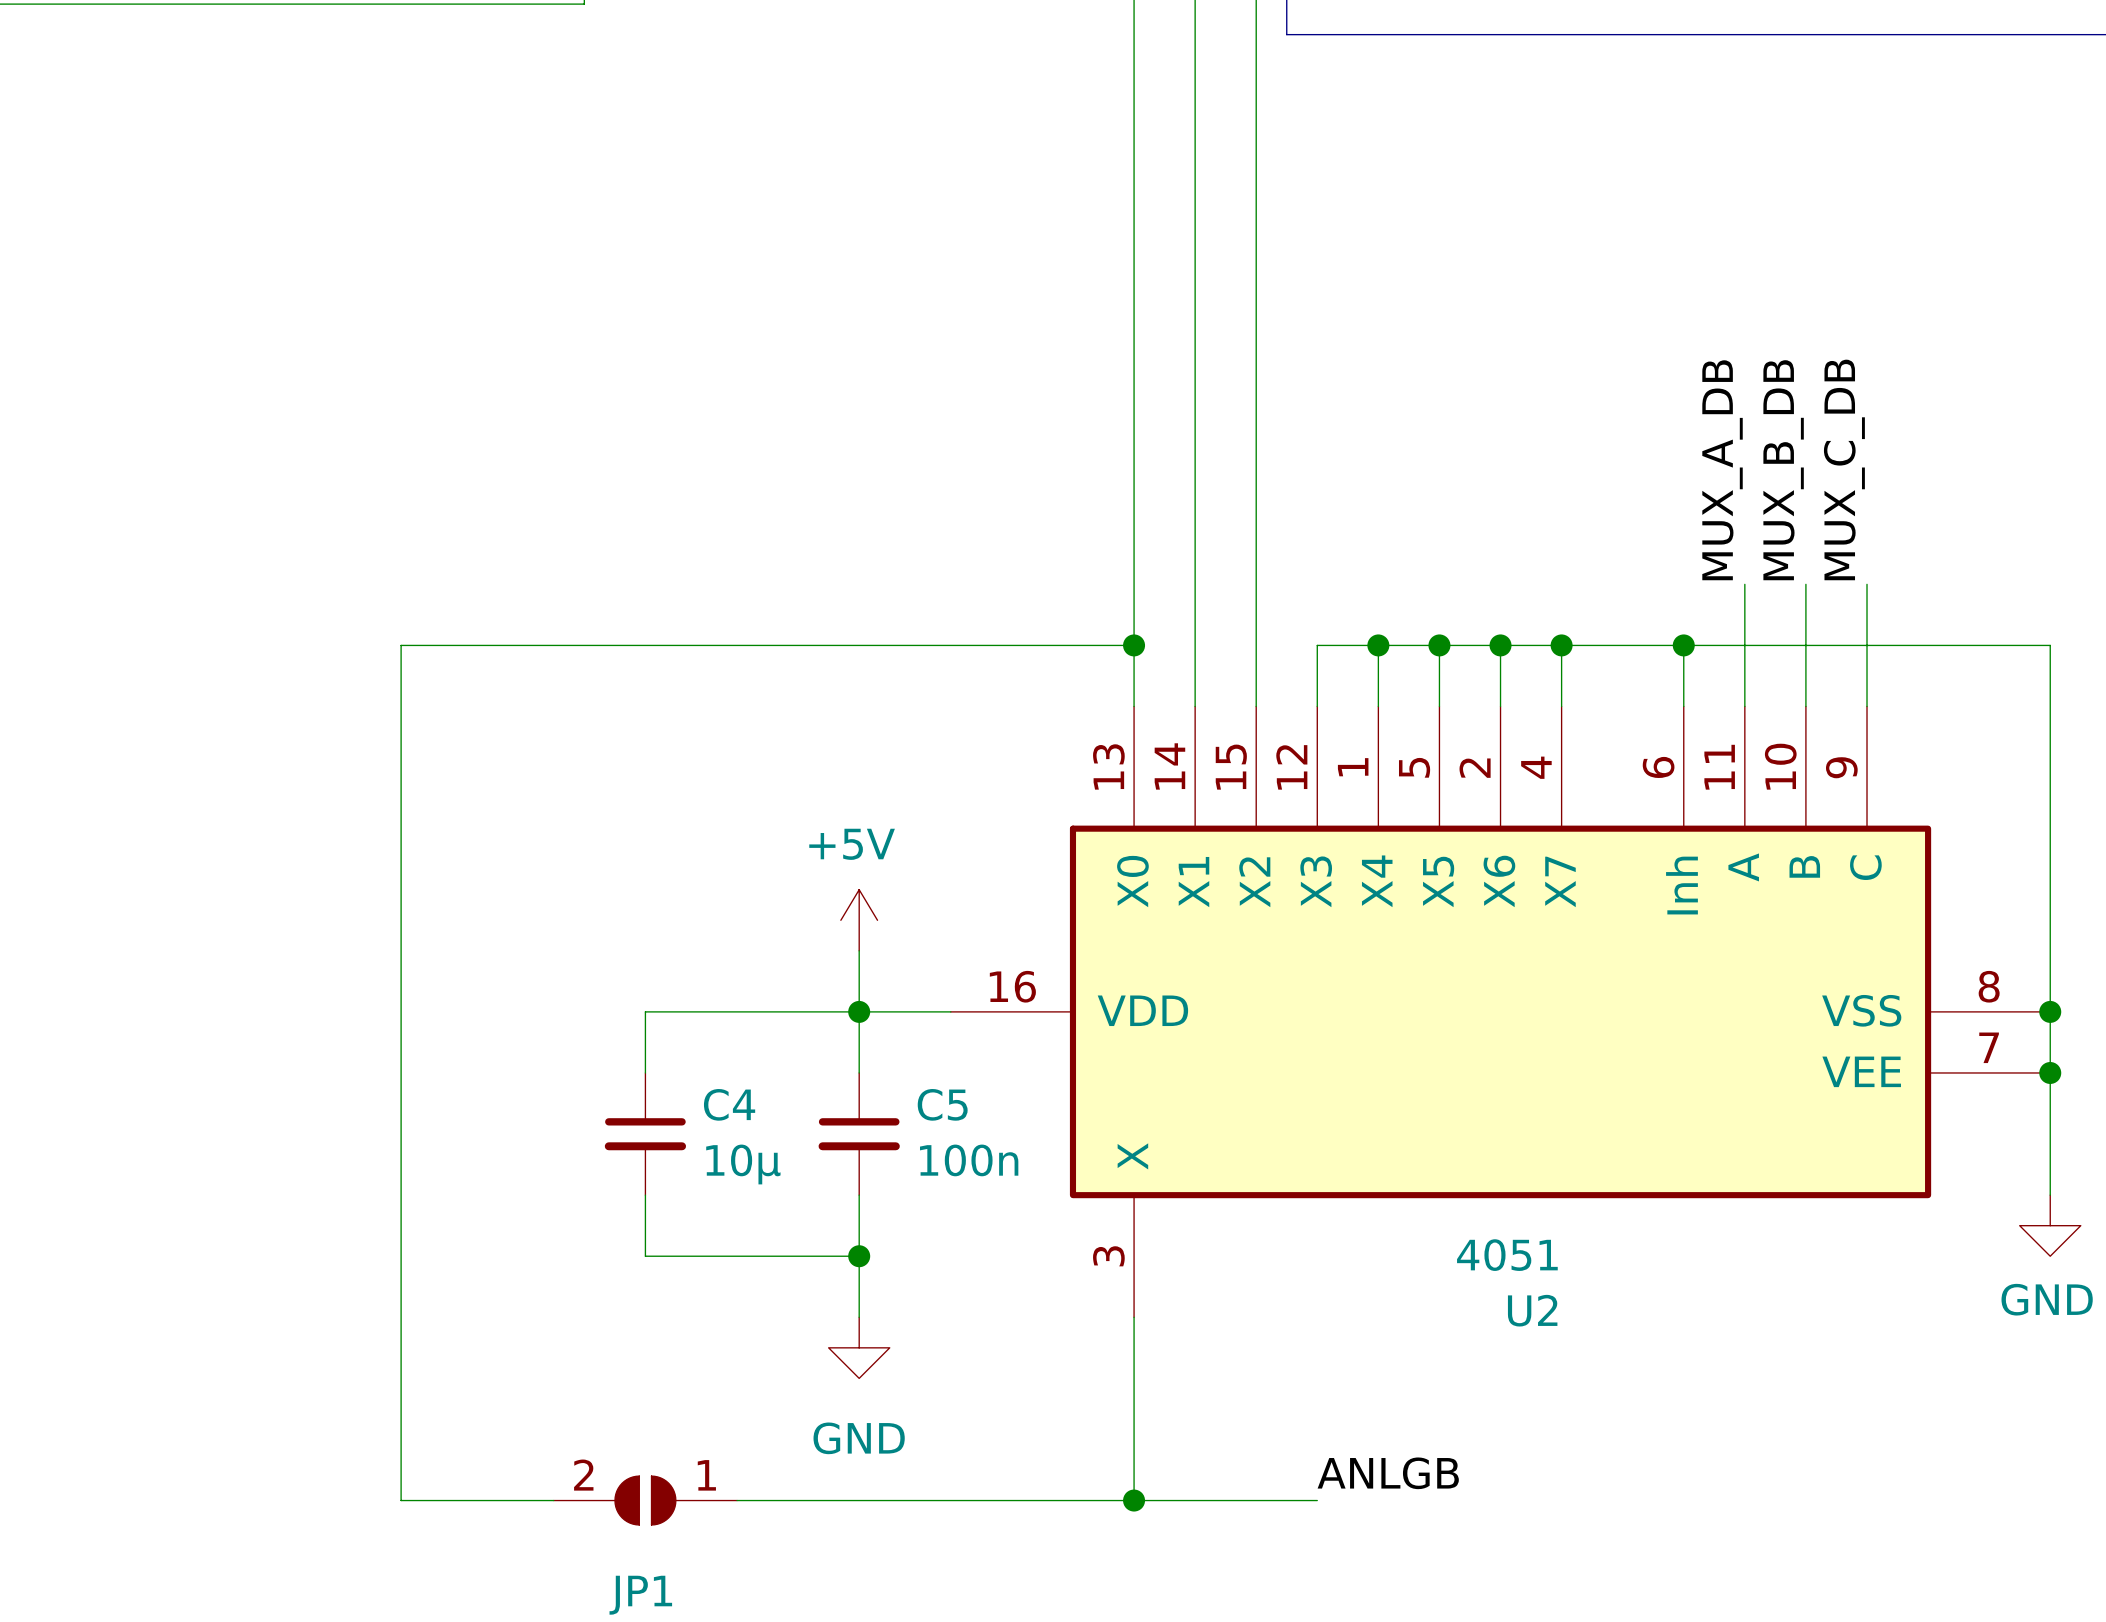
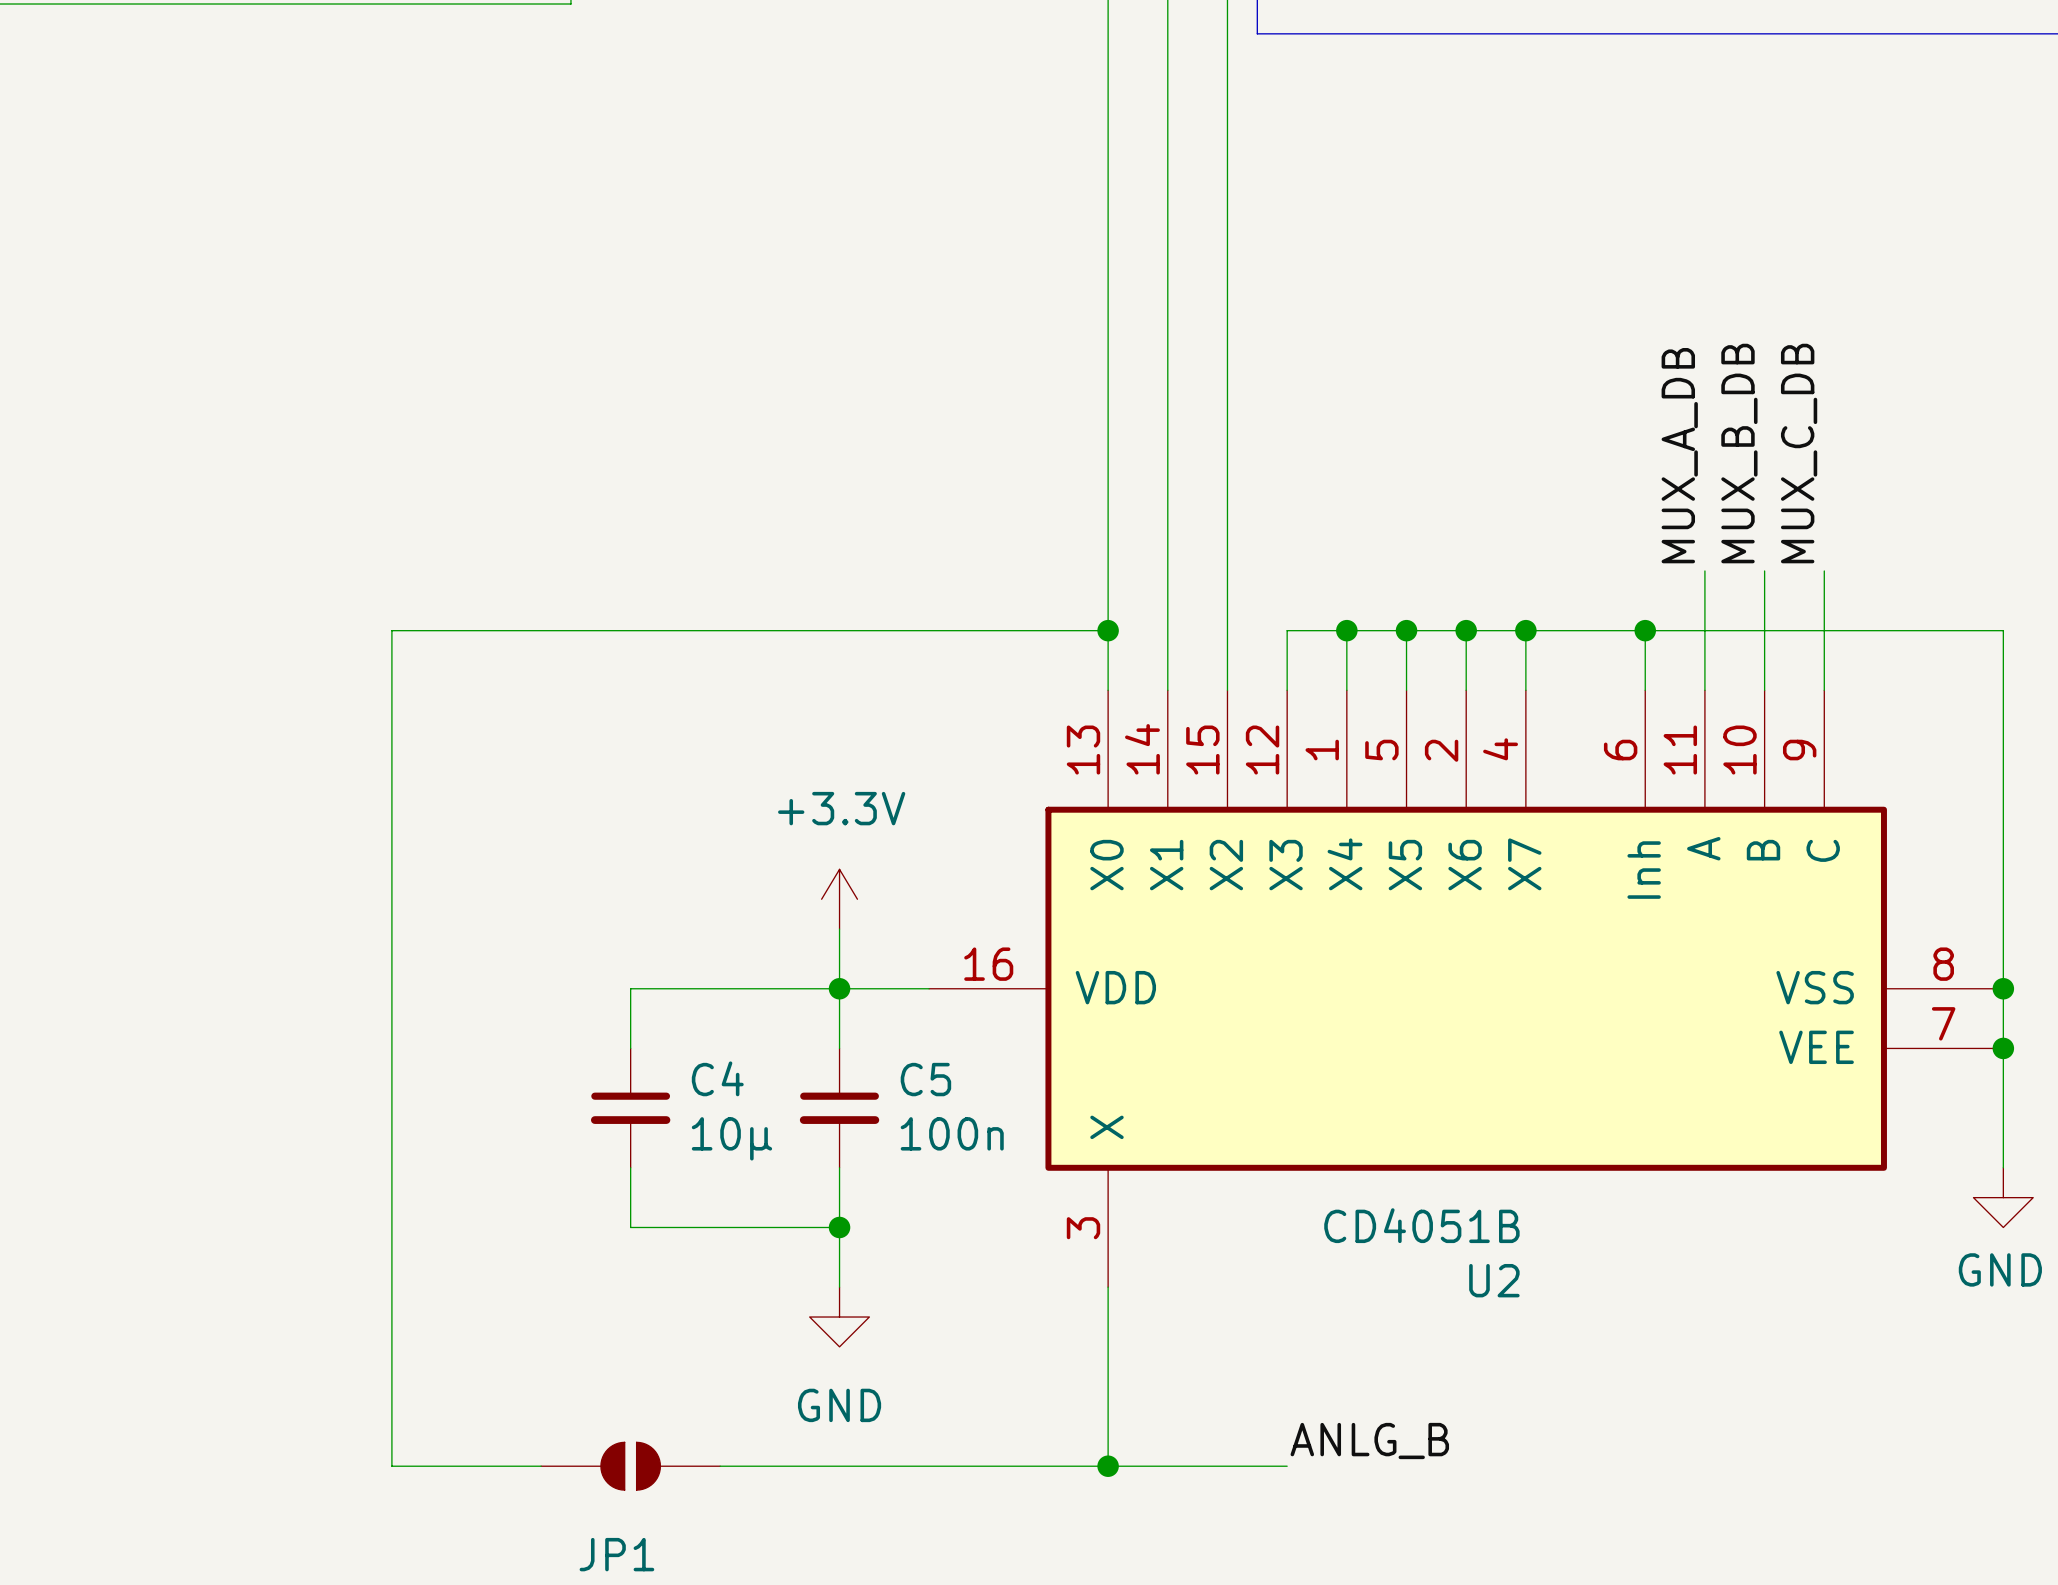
power symbol: +5V (859, 920) -> +3.3V (839, 899)
U2 value: 4051 (1507, 1255) -> CD4051B (1421, 1225)
label: ANLGB (1388, 1473) -> ANLG_B (1369, 1441)
JP1 pin number: 2 (583, 1475) -> none
JP1 pin number: 1 (706, 1475) -> none

